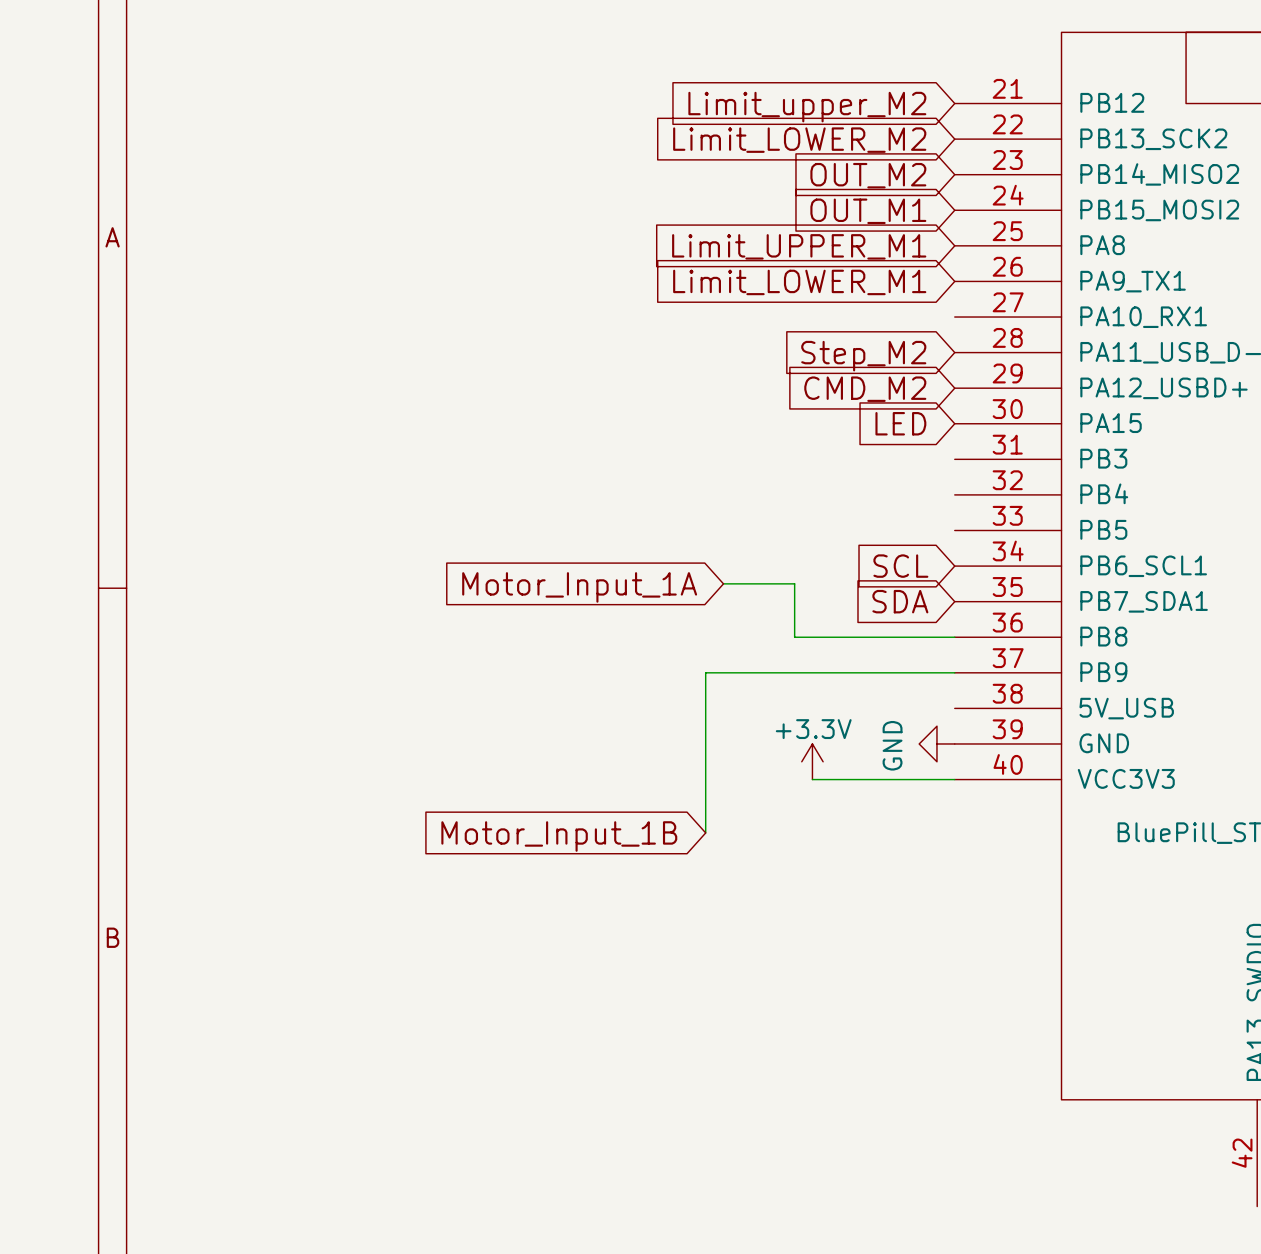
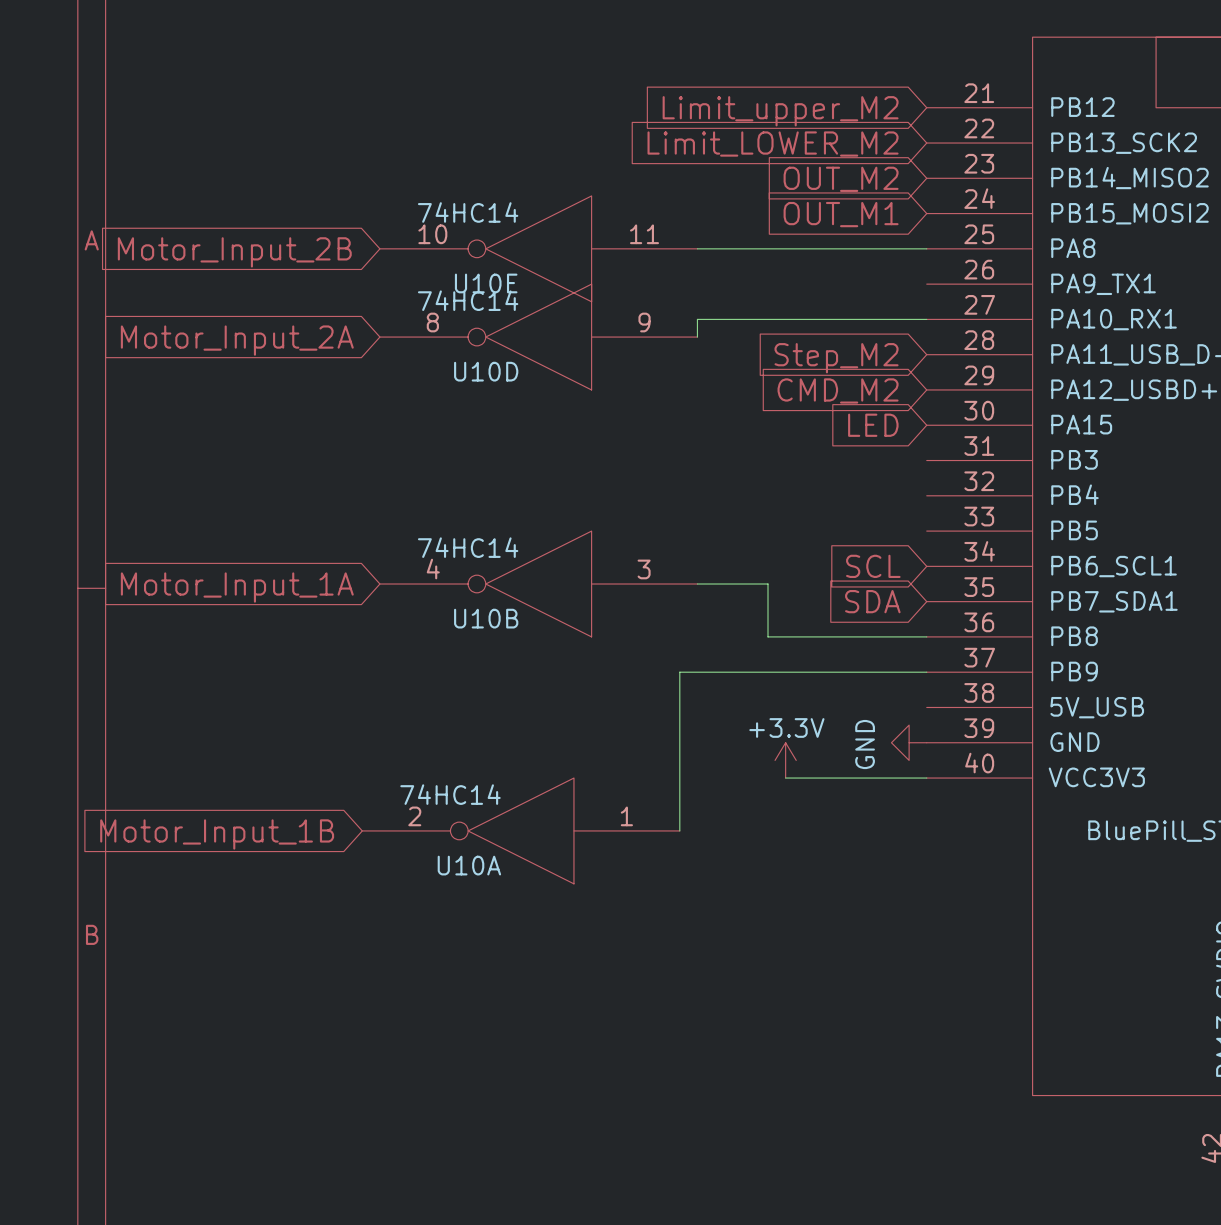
U10E: none -> 74HC14 (538, 248)
wire: none -> (697, 248) (926, 248)
global label: Limit_UPPER_M1 (799, 246) -> none
global label: none -> Motor_Input_2B (234, 252)
global label: Limit_LOWER_M1 (799, 282) -> none
wire: none -> (926, 319) (697, 319) (697, 337)
U10D: none -> 74HC14 (538, 337)
global label: none -> Motor_Input_2A (237, 340)
U10B: none -> 74HC14 (538, 584)
global label position: Motor_Input_1A (579, 587) -> Motor_Input_1A (237, 587)
U10A: none -> 74HC14 (521, 830)
global label position: Motor_Input_1B (559, 836) -> Motor_Input_1B (217, 834)

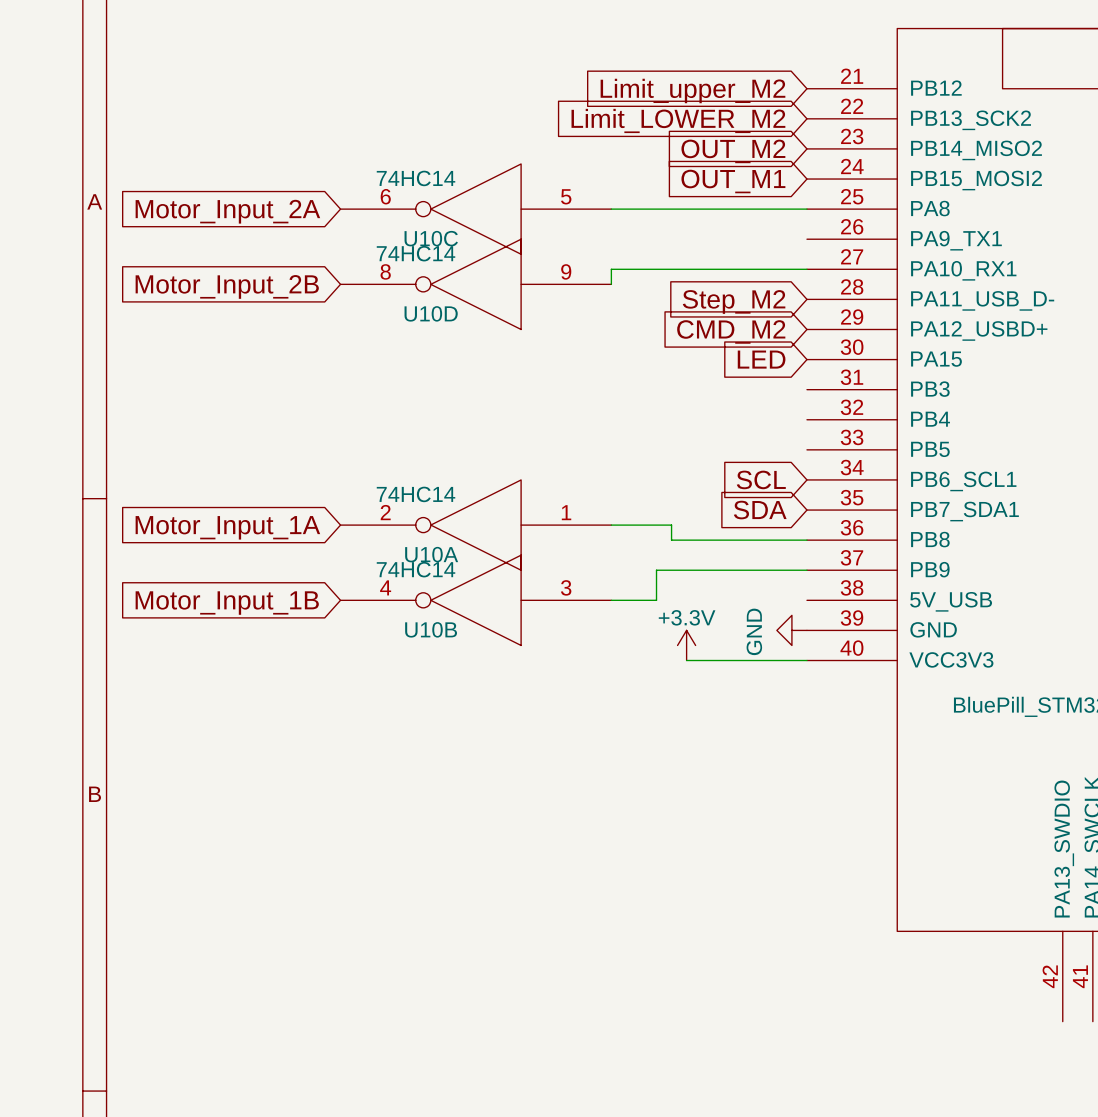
U10E pin number: 10 (432, 234) -> 6 (385, 196)
U10E pin number: 11 (644, 234) -> 5 (566, 196)
global label: Motor_Input_2B (234, 252) -> Motor_Input_2A (227, 211)
U10E name: U10E (486, 283) -> U10C (431, 238)
global label: Motor_Input_2A (237, 340) -> Motor_Input_2B (227, 286)
U10B position: (538, 584) -> (475, 600)
wire: (697, 584) (768, 584) (768, 619) -> (611, 525) (671, 525)
global label position: Motor_Input_1A (237, 587) -> Motor_Input_1A (227, 527)
wire: (750, 672) (679, 672) (679, 830) -> (656, 570) (656, 600) (611, 600)
U10A position: (521, 830) -> (475, 525)
global label position: Motor_Input_1B (217, 834) -> Motor_Input_1B (227, 603)

